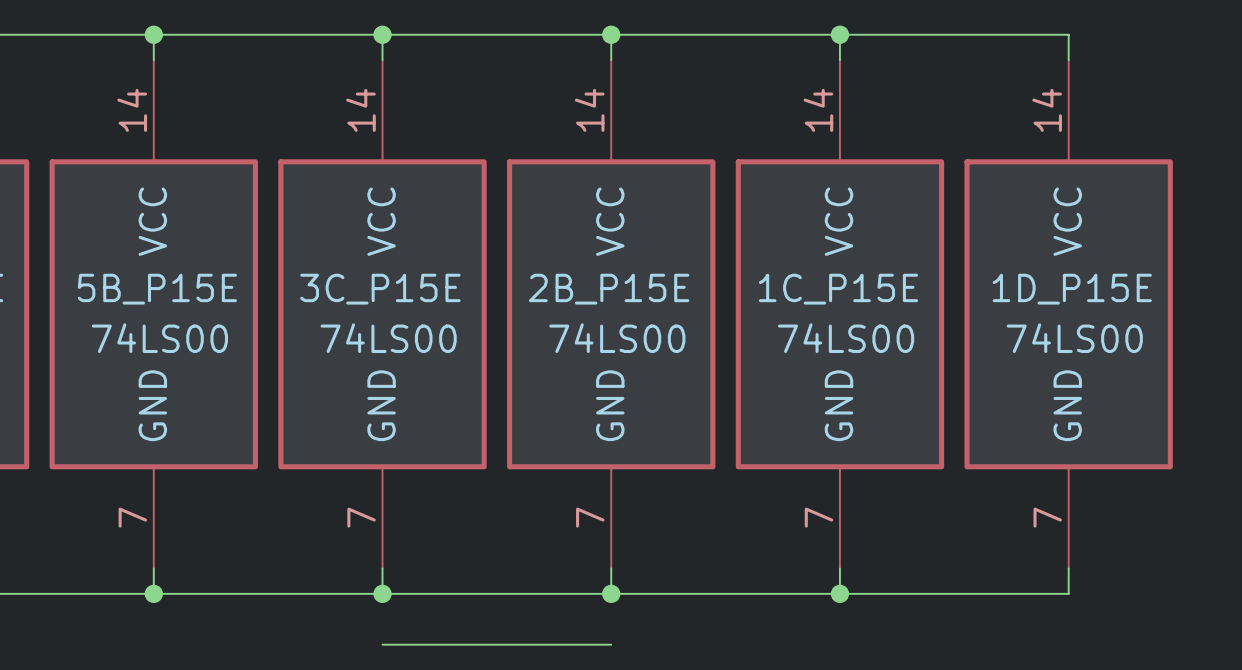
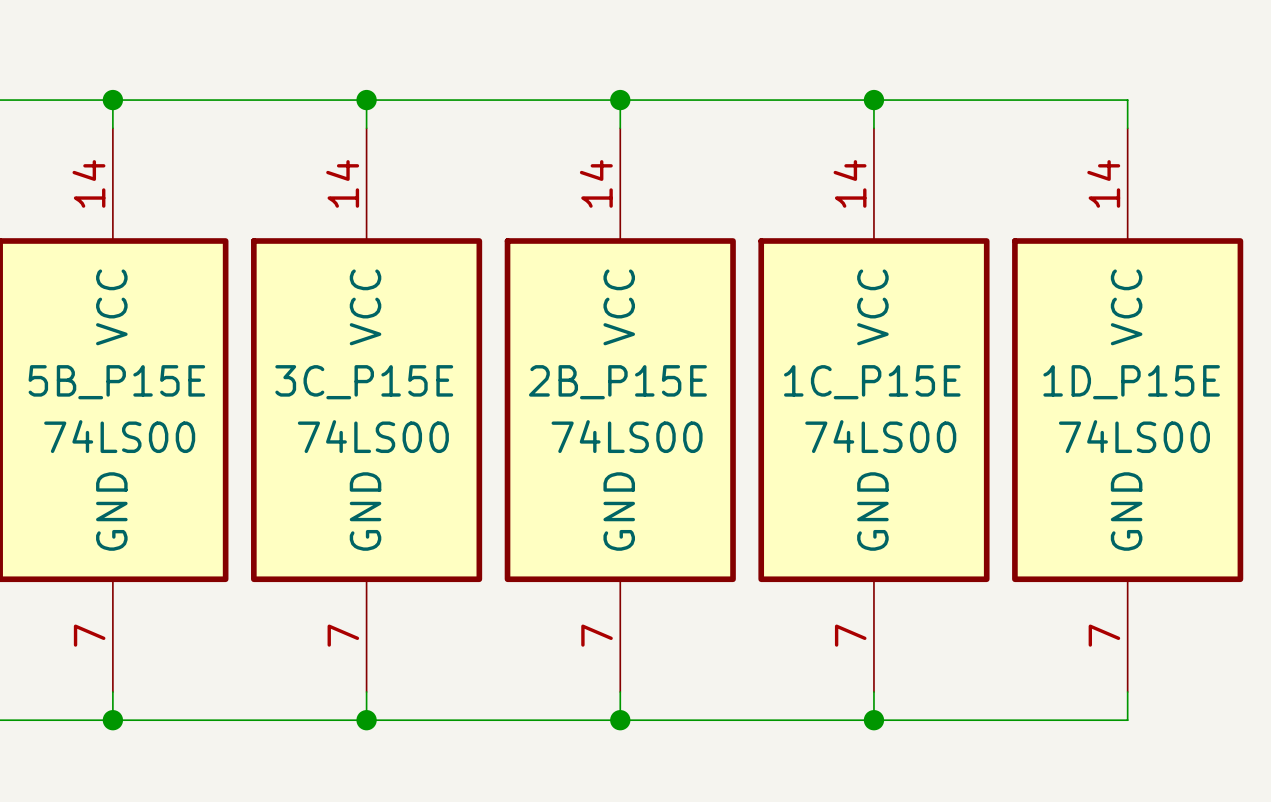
wire: (382, 644) (611, 644) -> none

